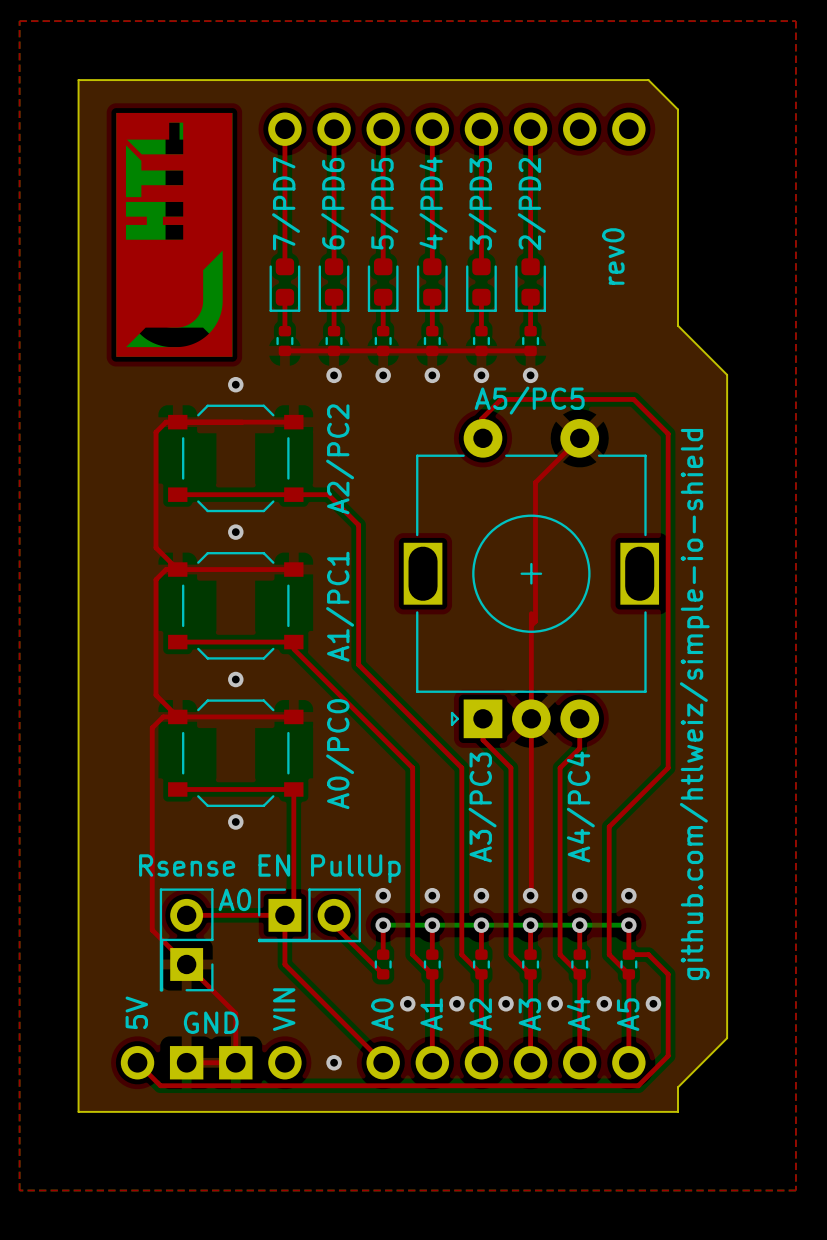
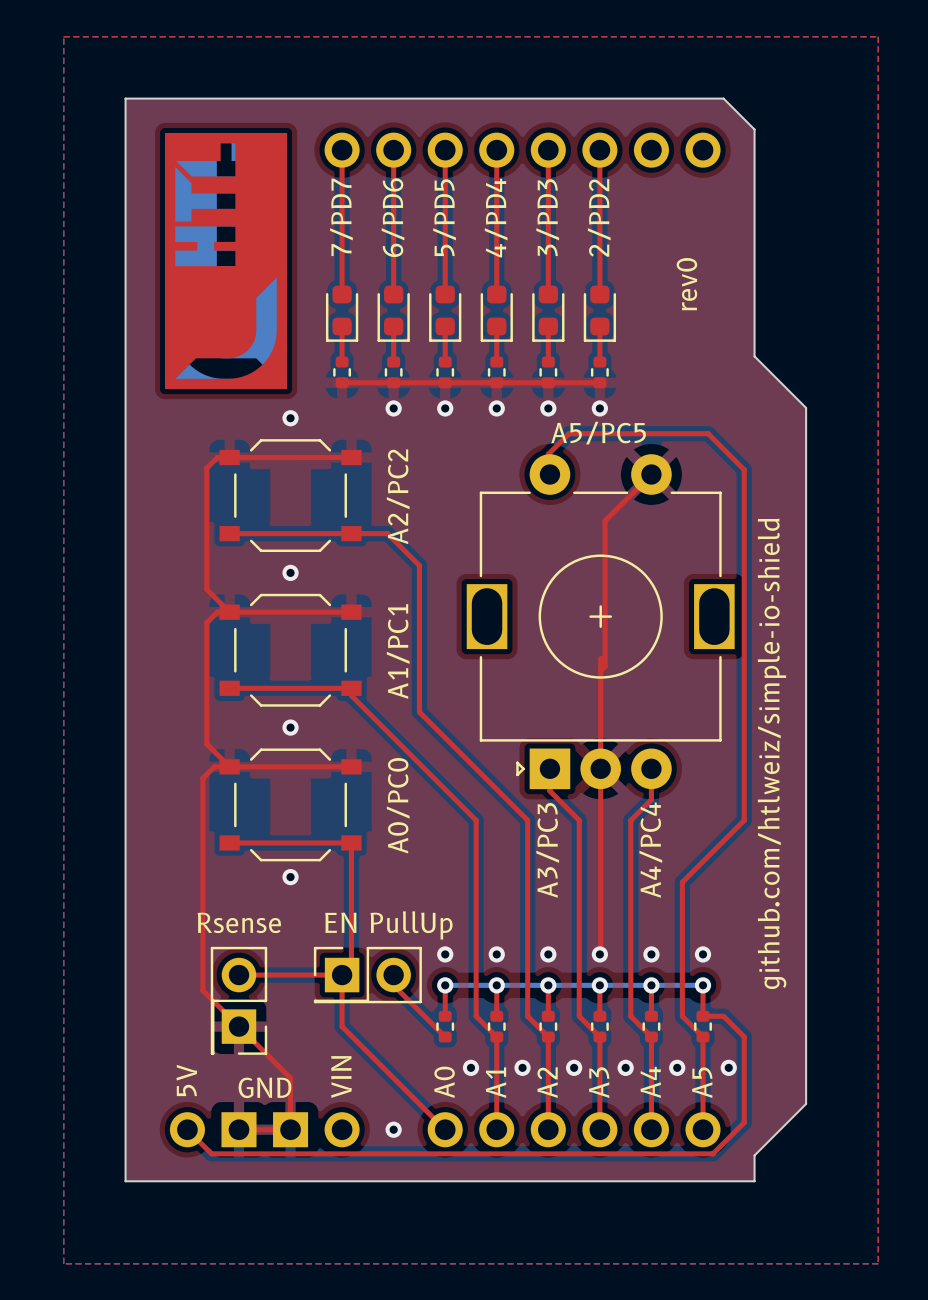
text: A0 (234, 899) -> none

